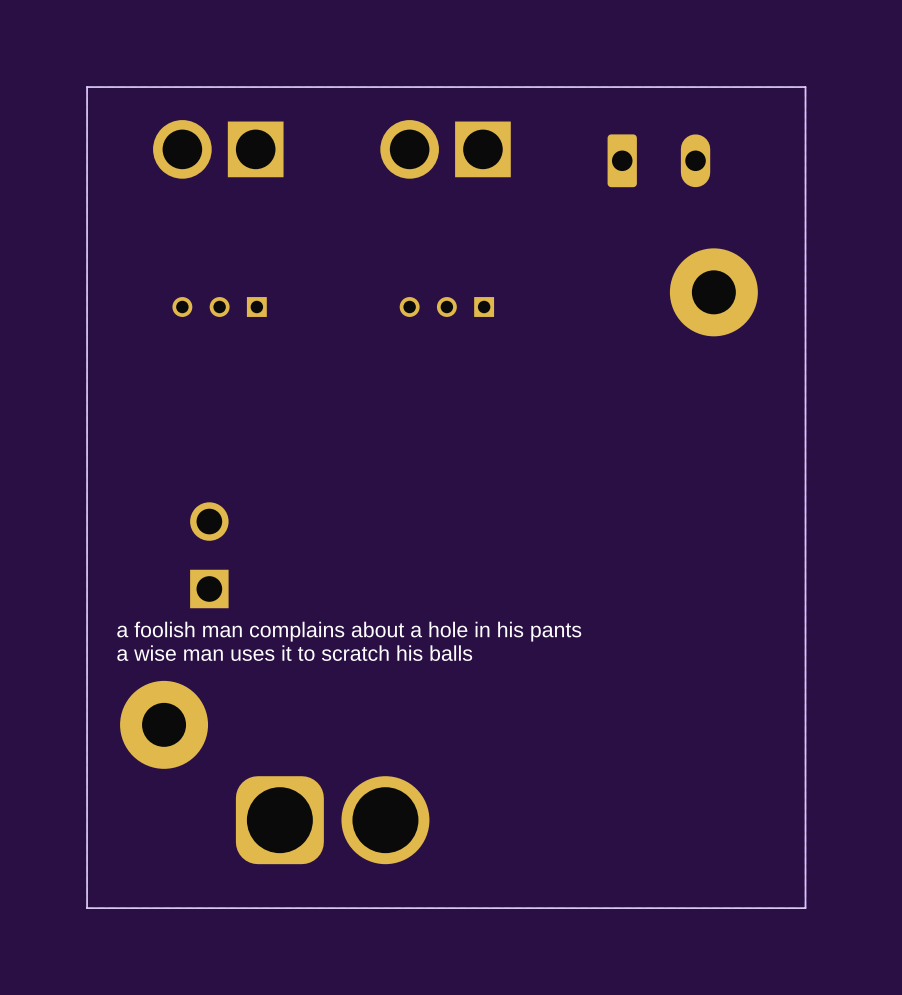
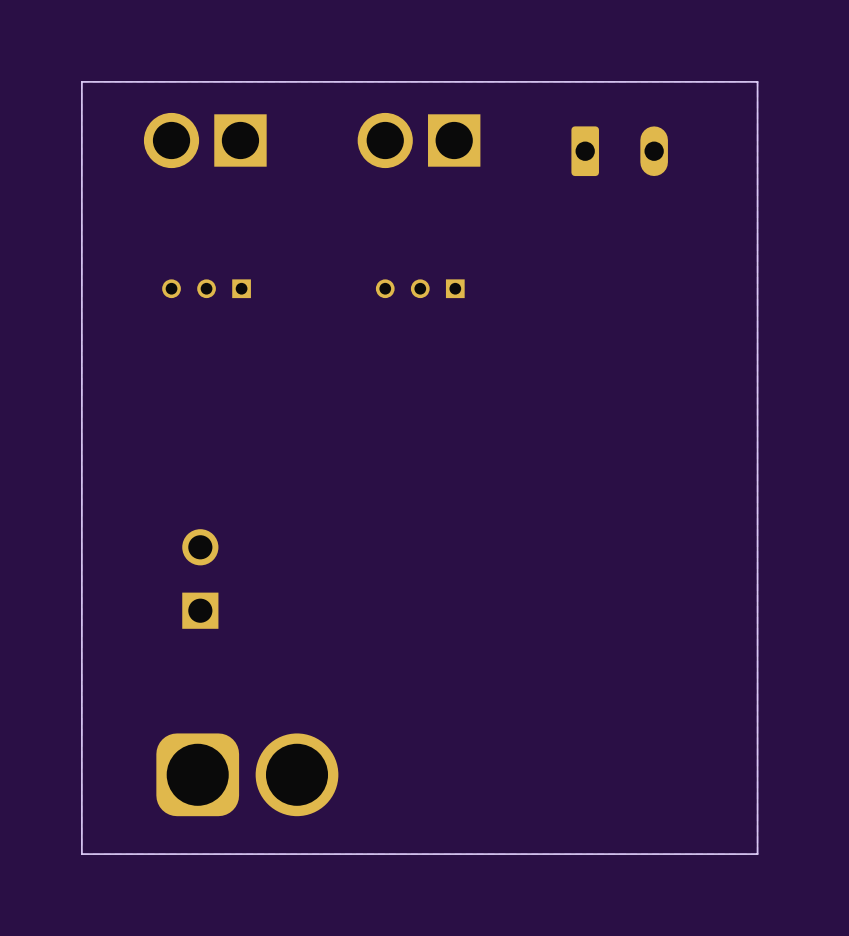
part: (713, 292) -> none
part position: (209, 555) -> (200, 578)
text: a foolish man complains about a hole in his pants (349, 631) -> none
text: a wise man uses it to scratch his balls (294, 653) -> none
part: (164, 724) -> none
part position: (332, 820) -> (247, 774)

